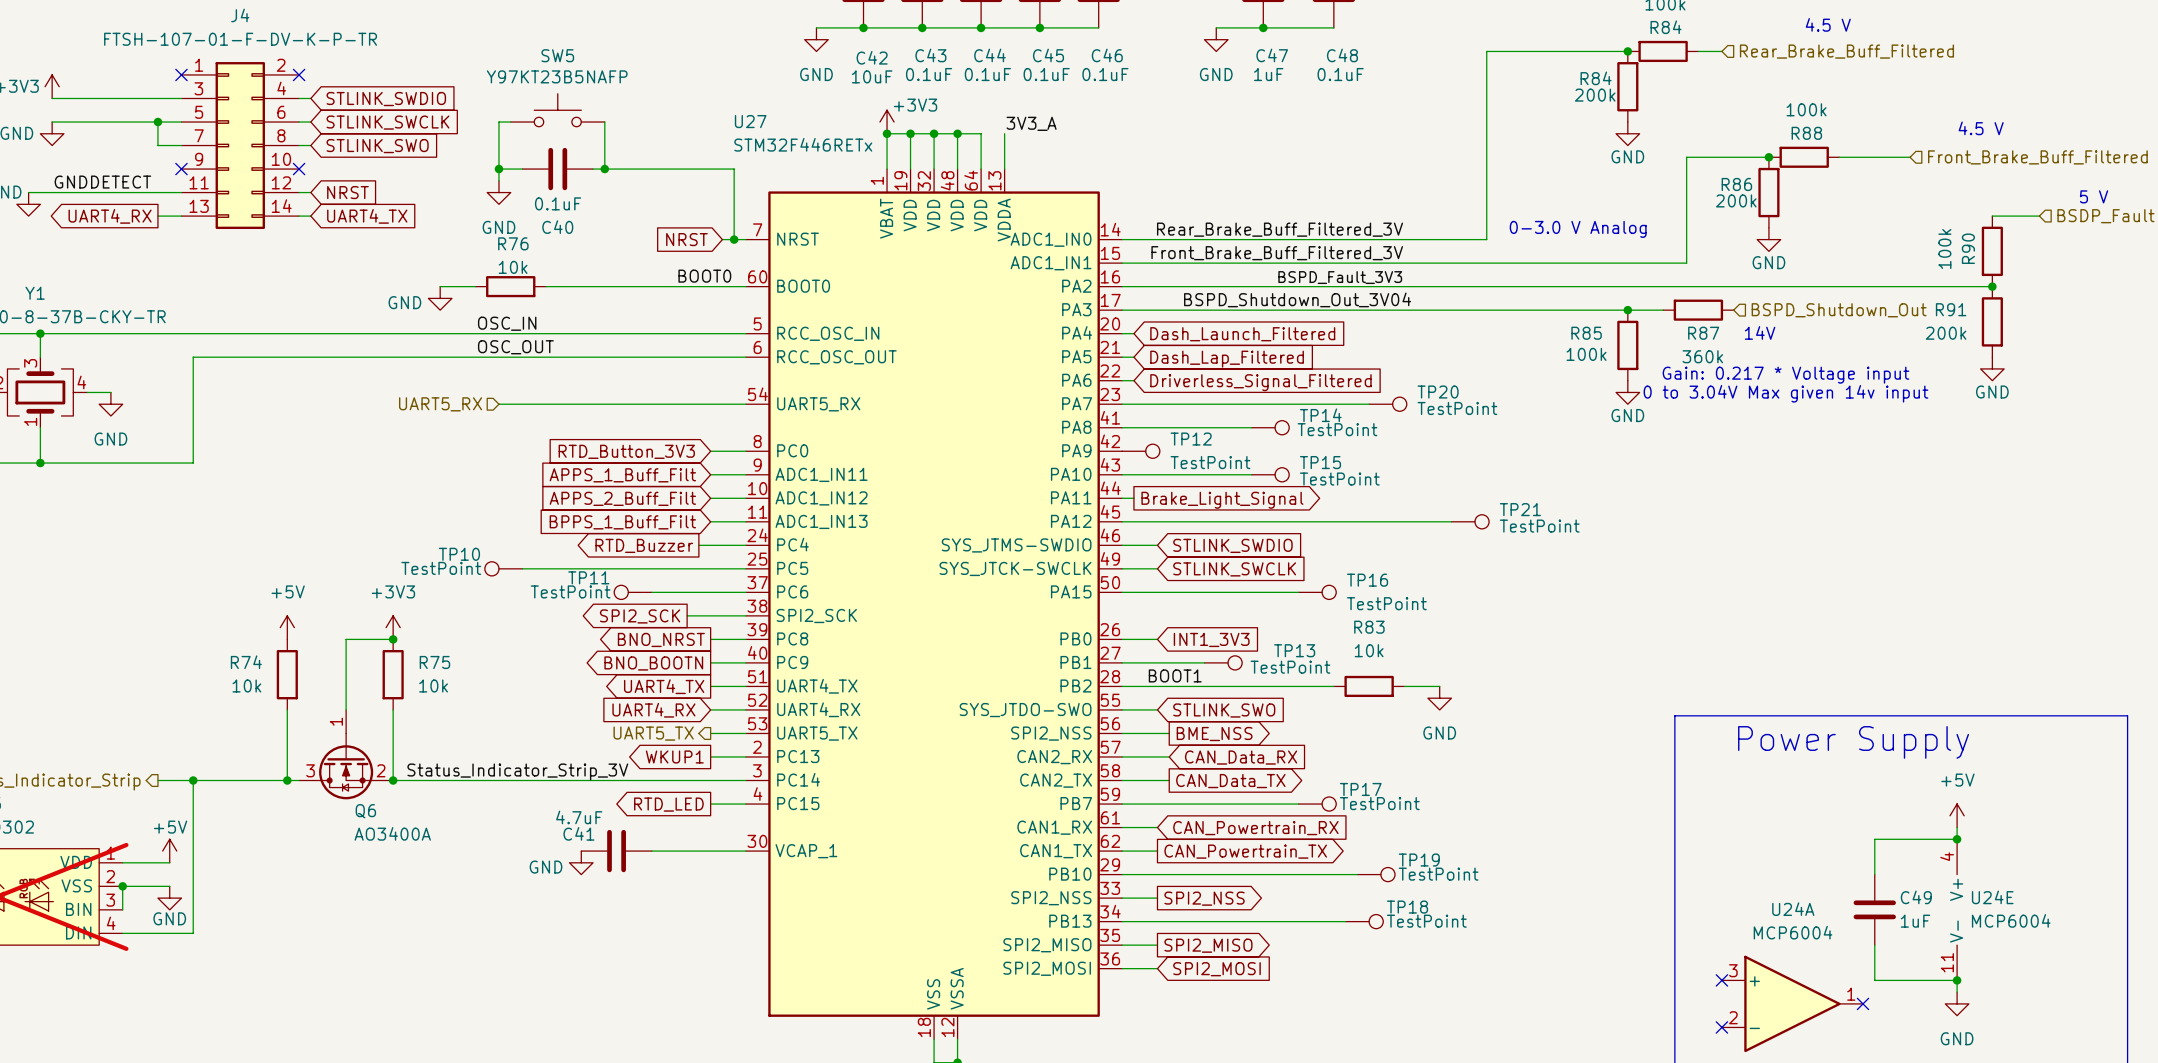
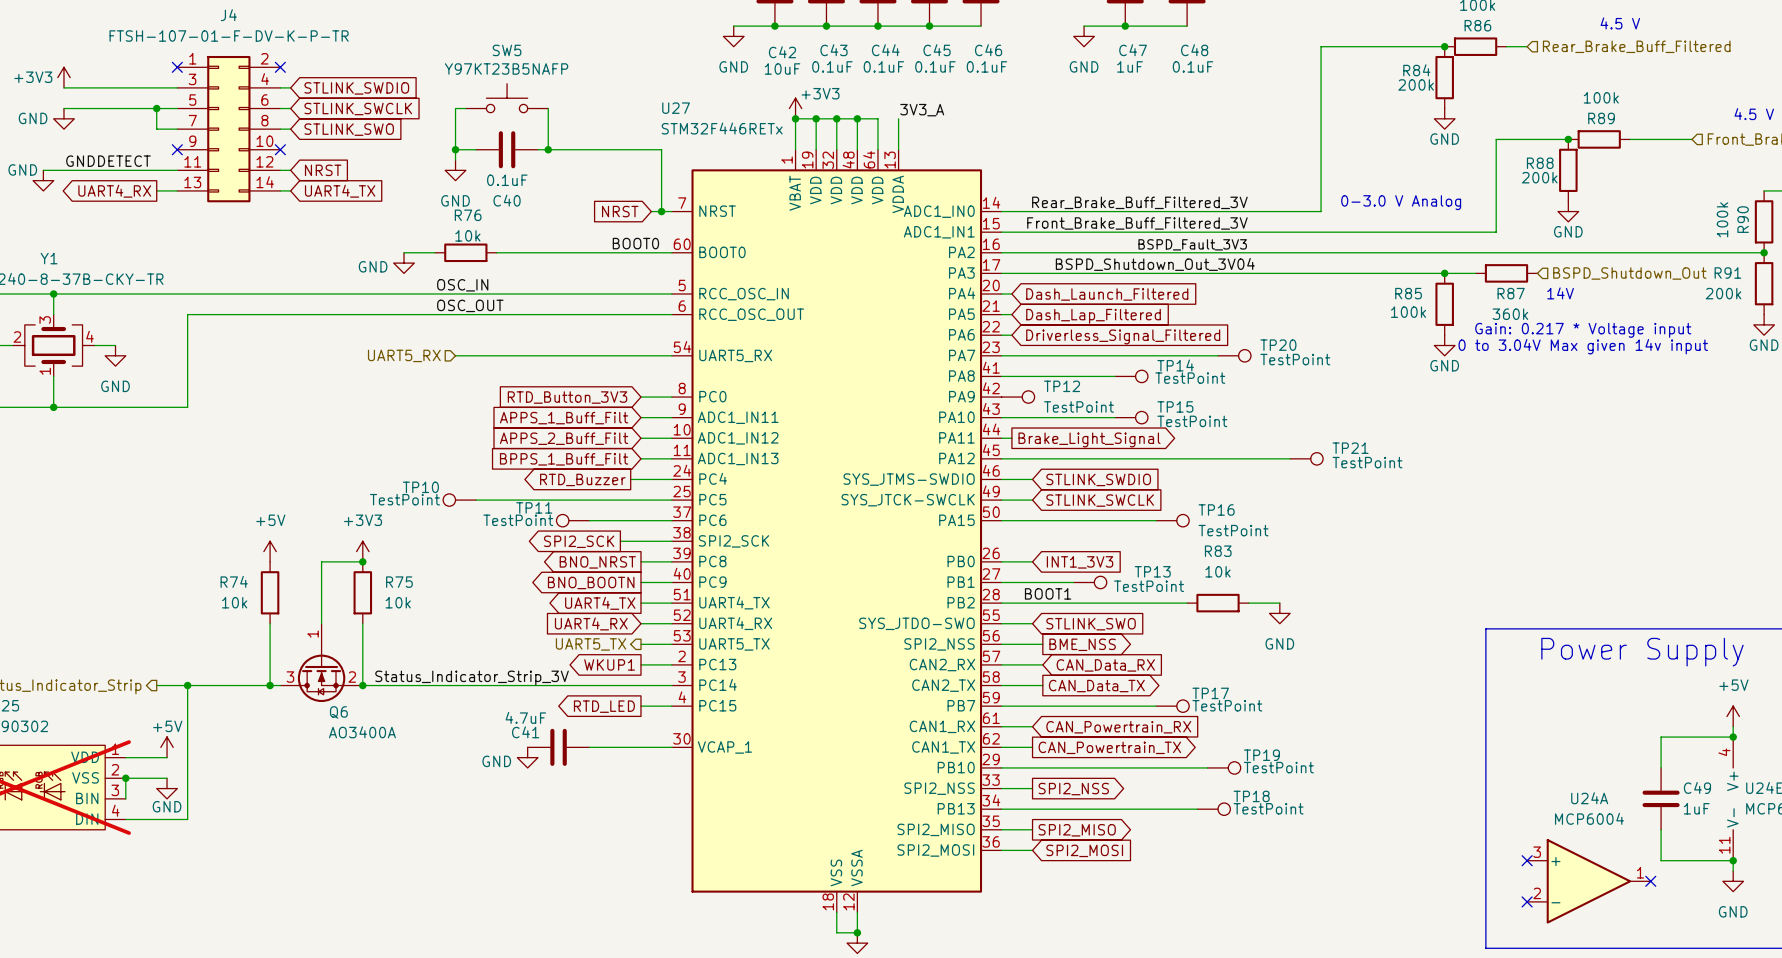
R84 name: R84 (1666, 27) -> R86 (1477, 25)
R88 name: R88 (1806, 133) -> R89 (1601, 118)
R86 name: R86 (1736, 184) -> R88 (1540, 163)

